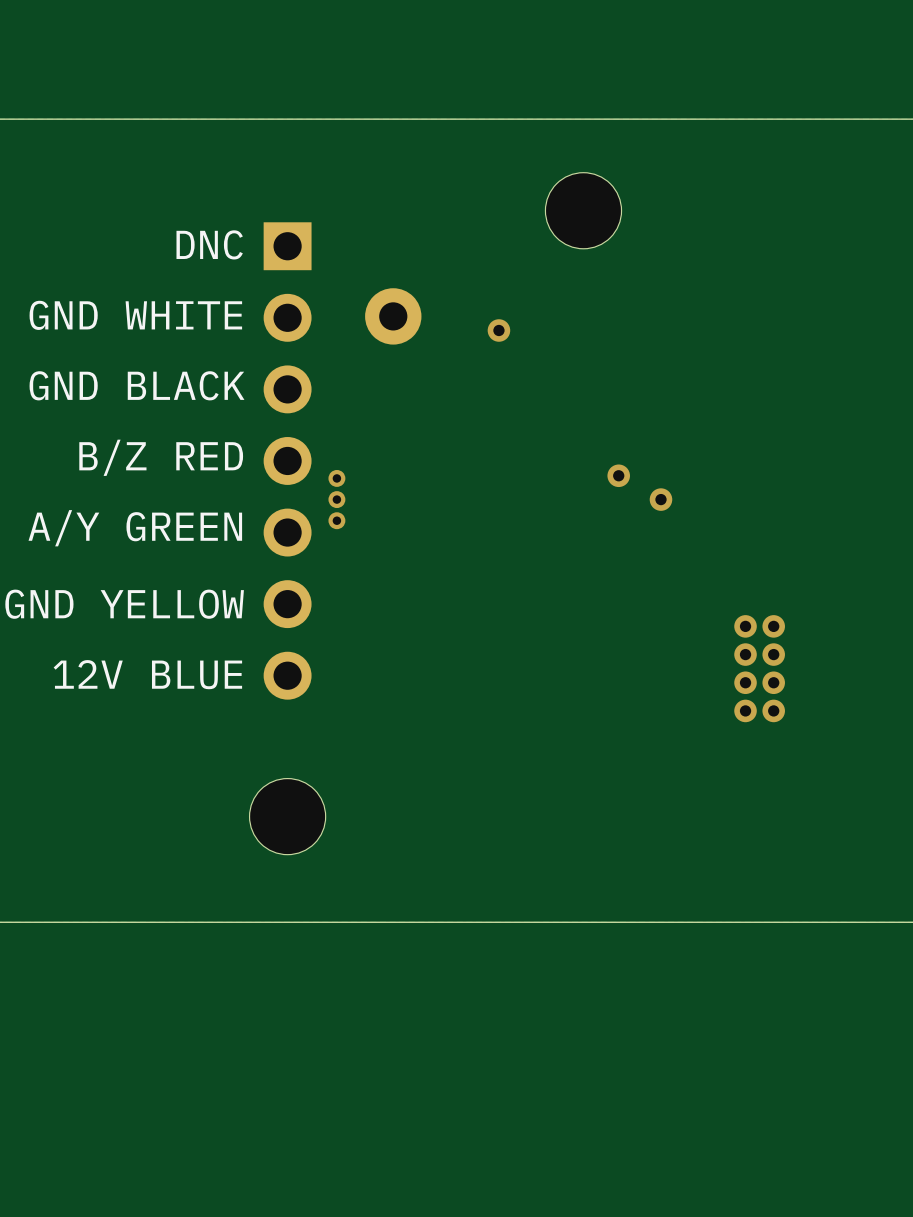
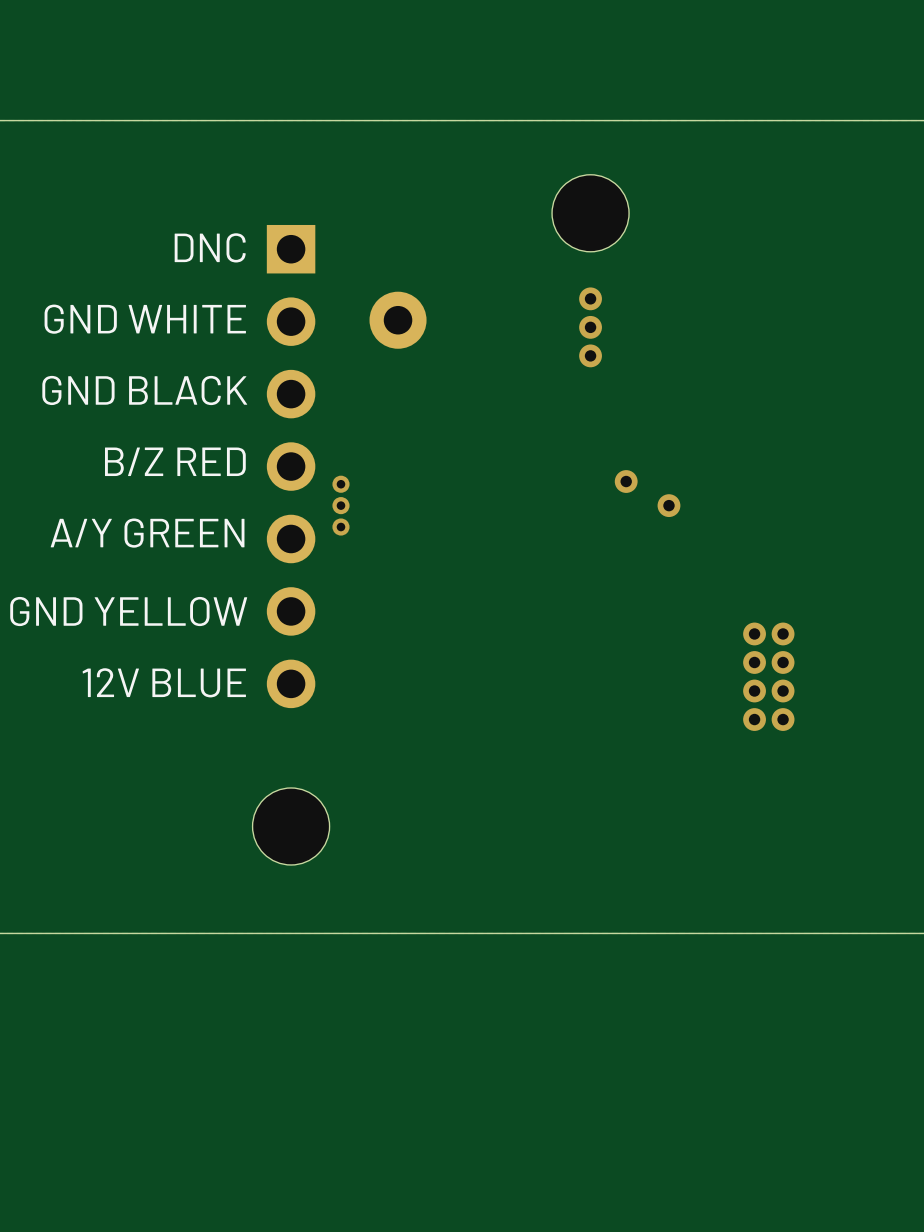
via: none -> (590, 298)
via: none -> (590, 327)
via: (498, 330) -> none
via: none -> (590, 355)

